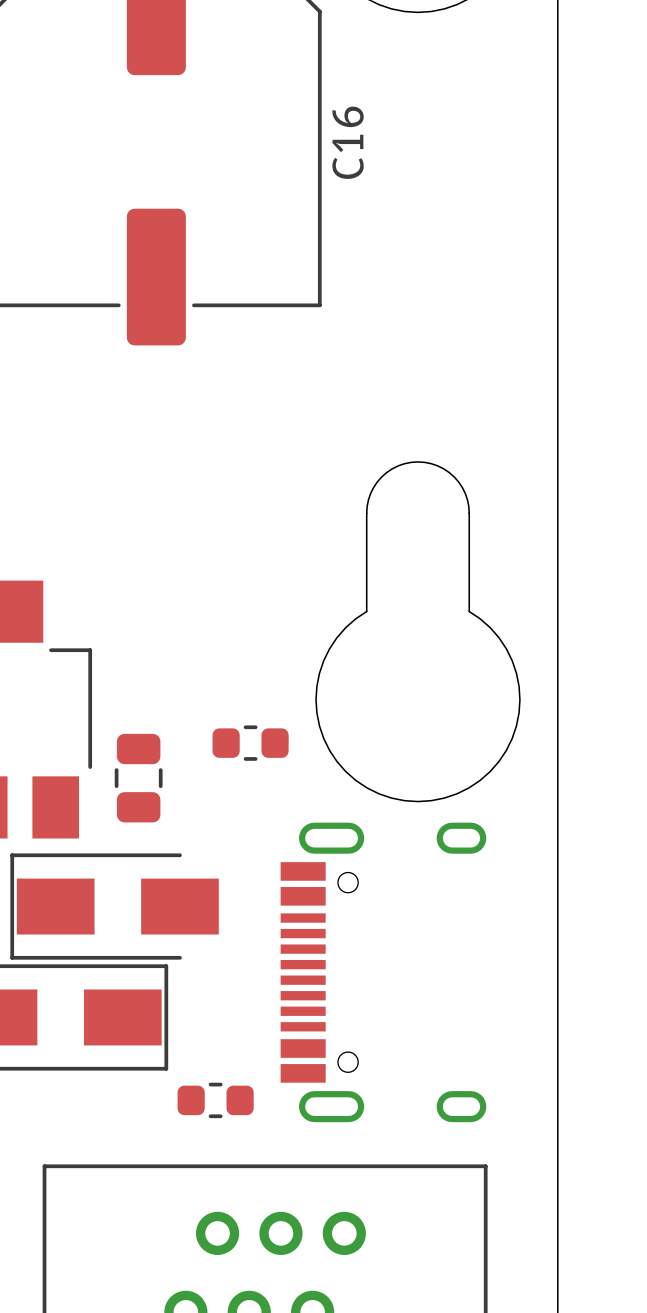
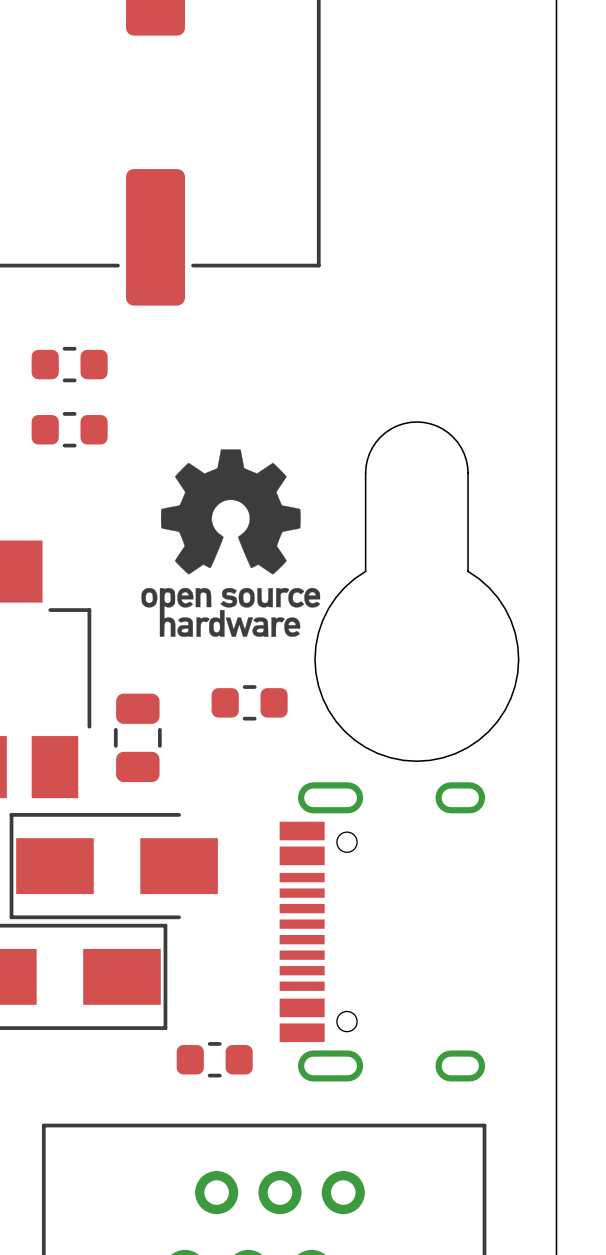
C16 name: C16 (348, 142) -> none
part: none -> (69, 364)
part: none -> (69, 429)
drawing: none -> [141, 449, 321, 637]

